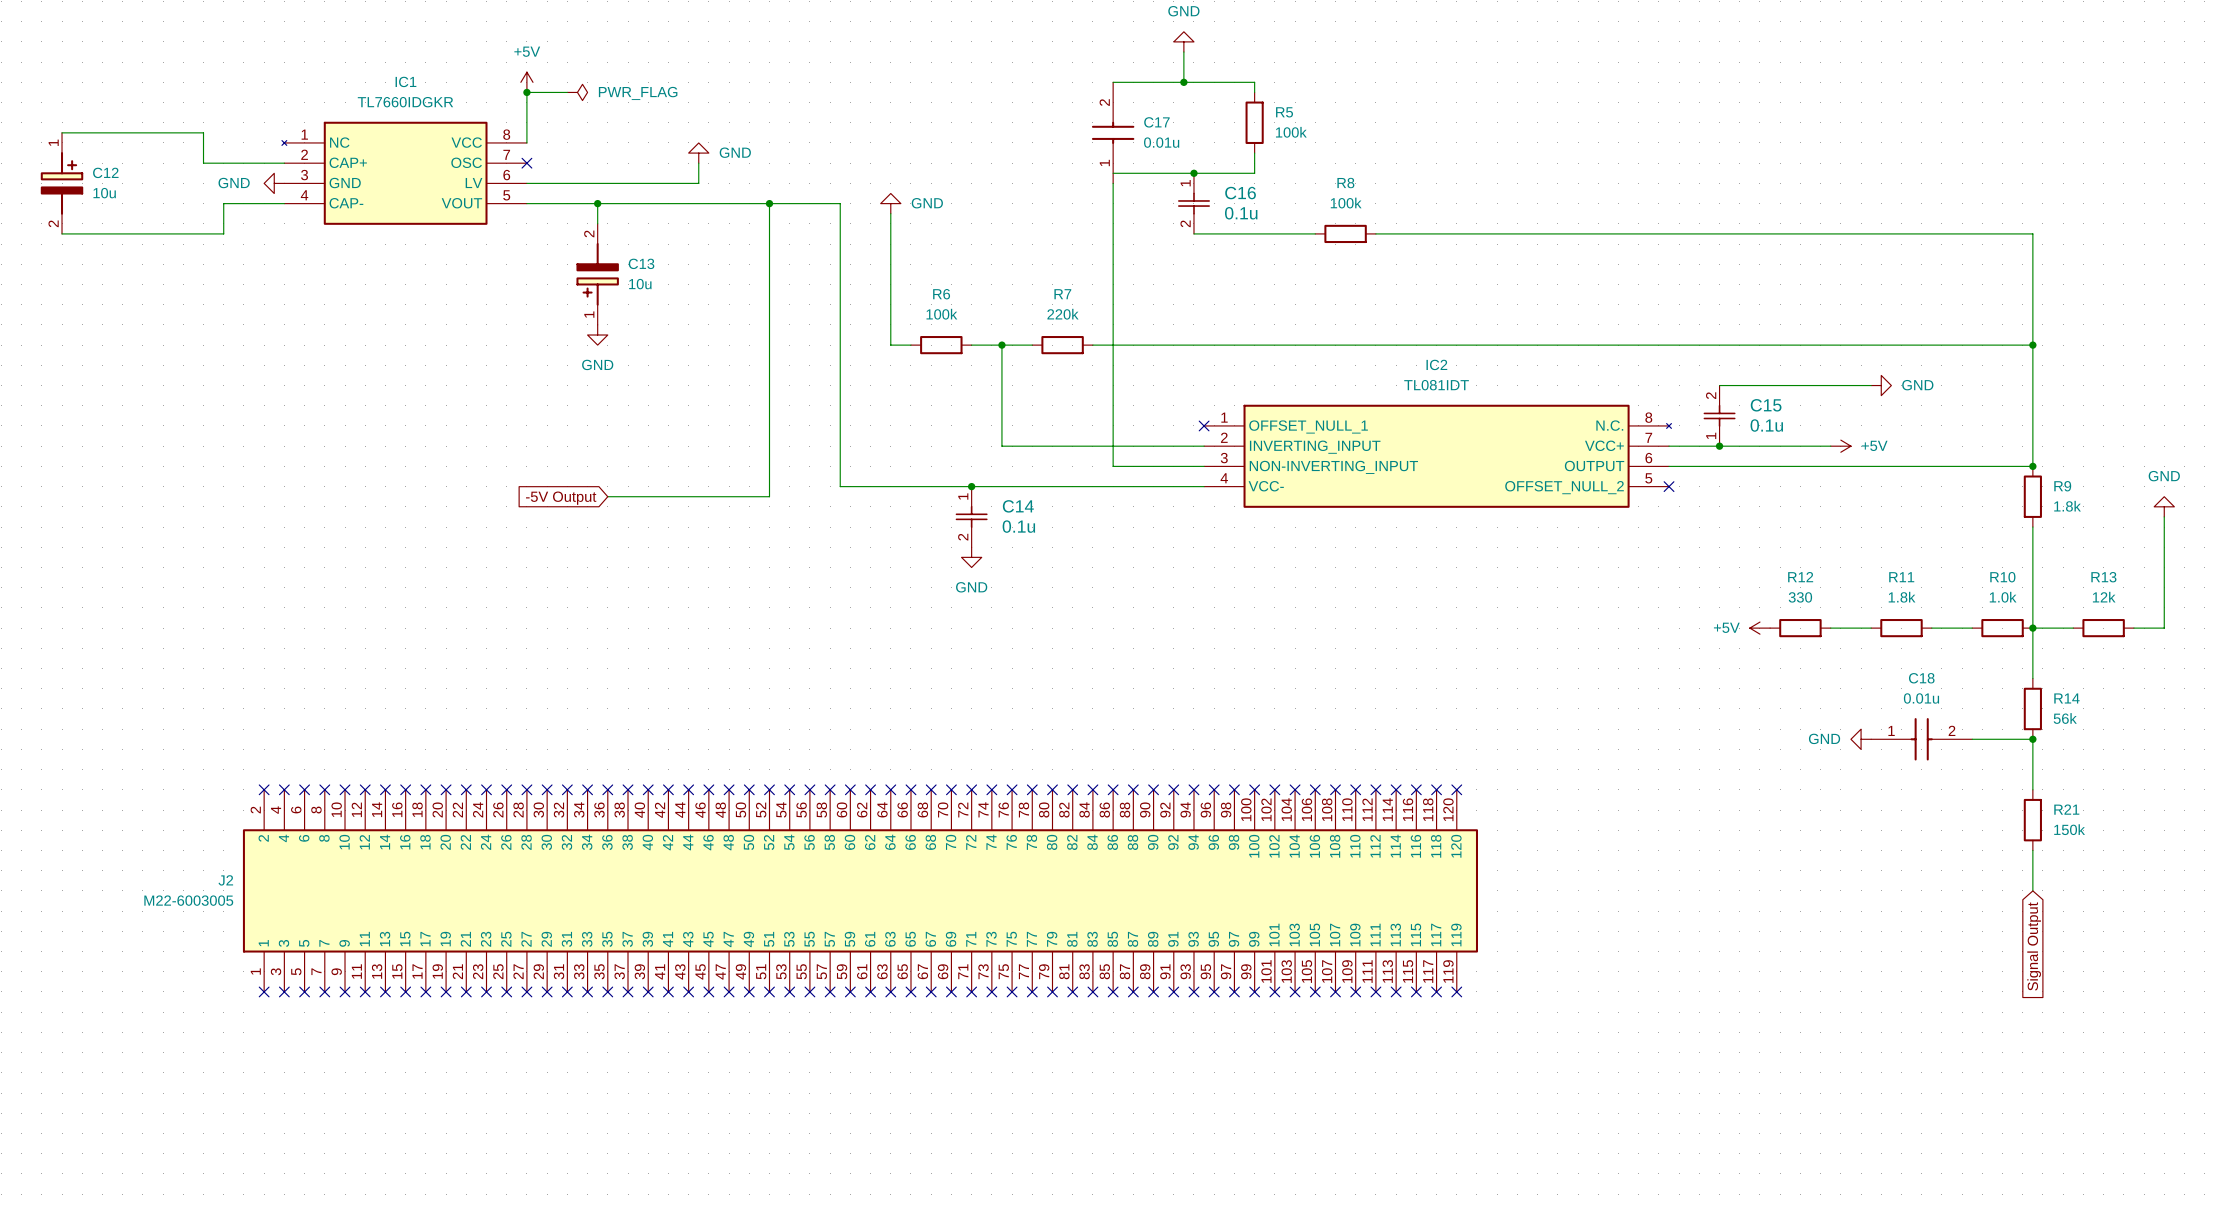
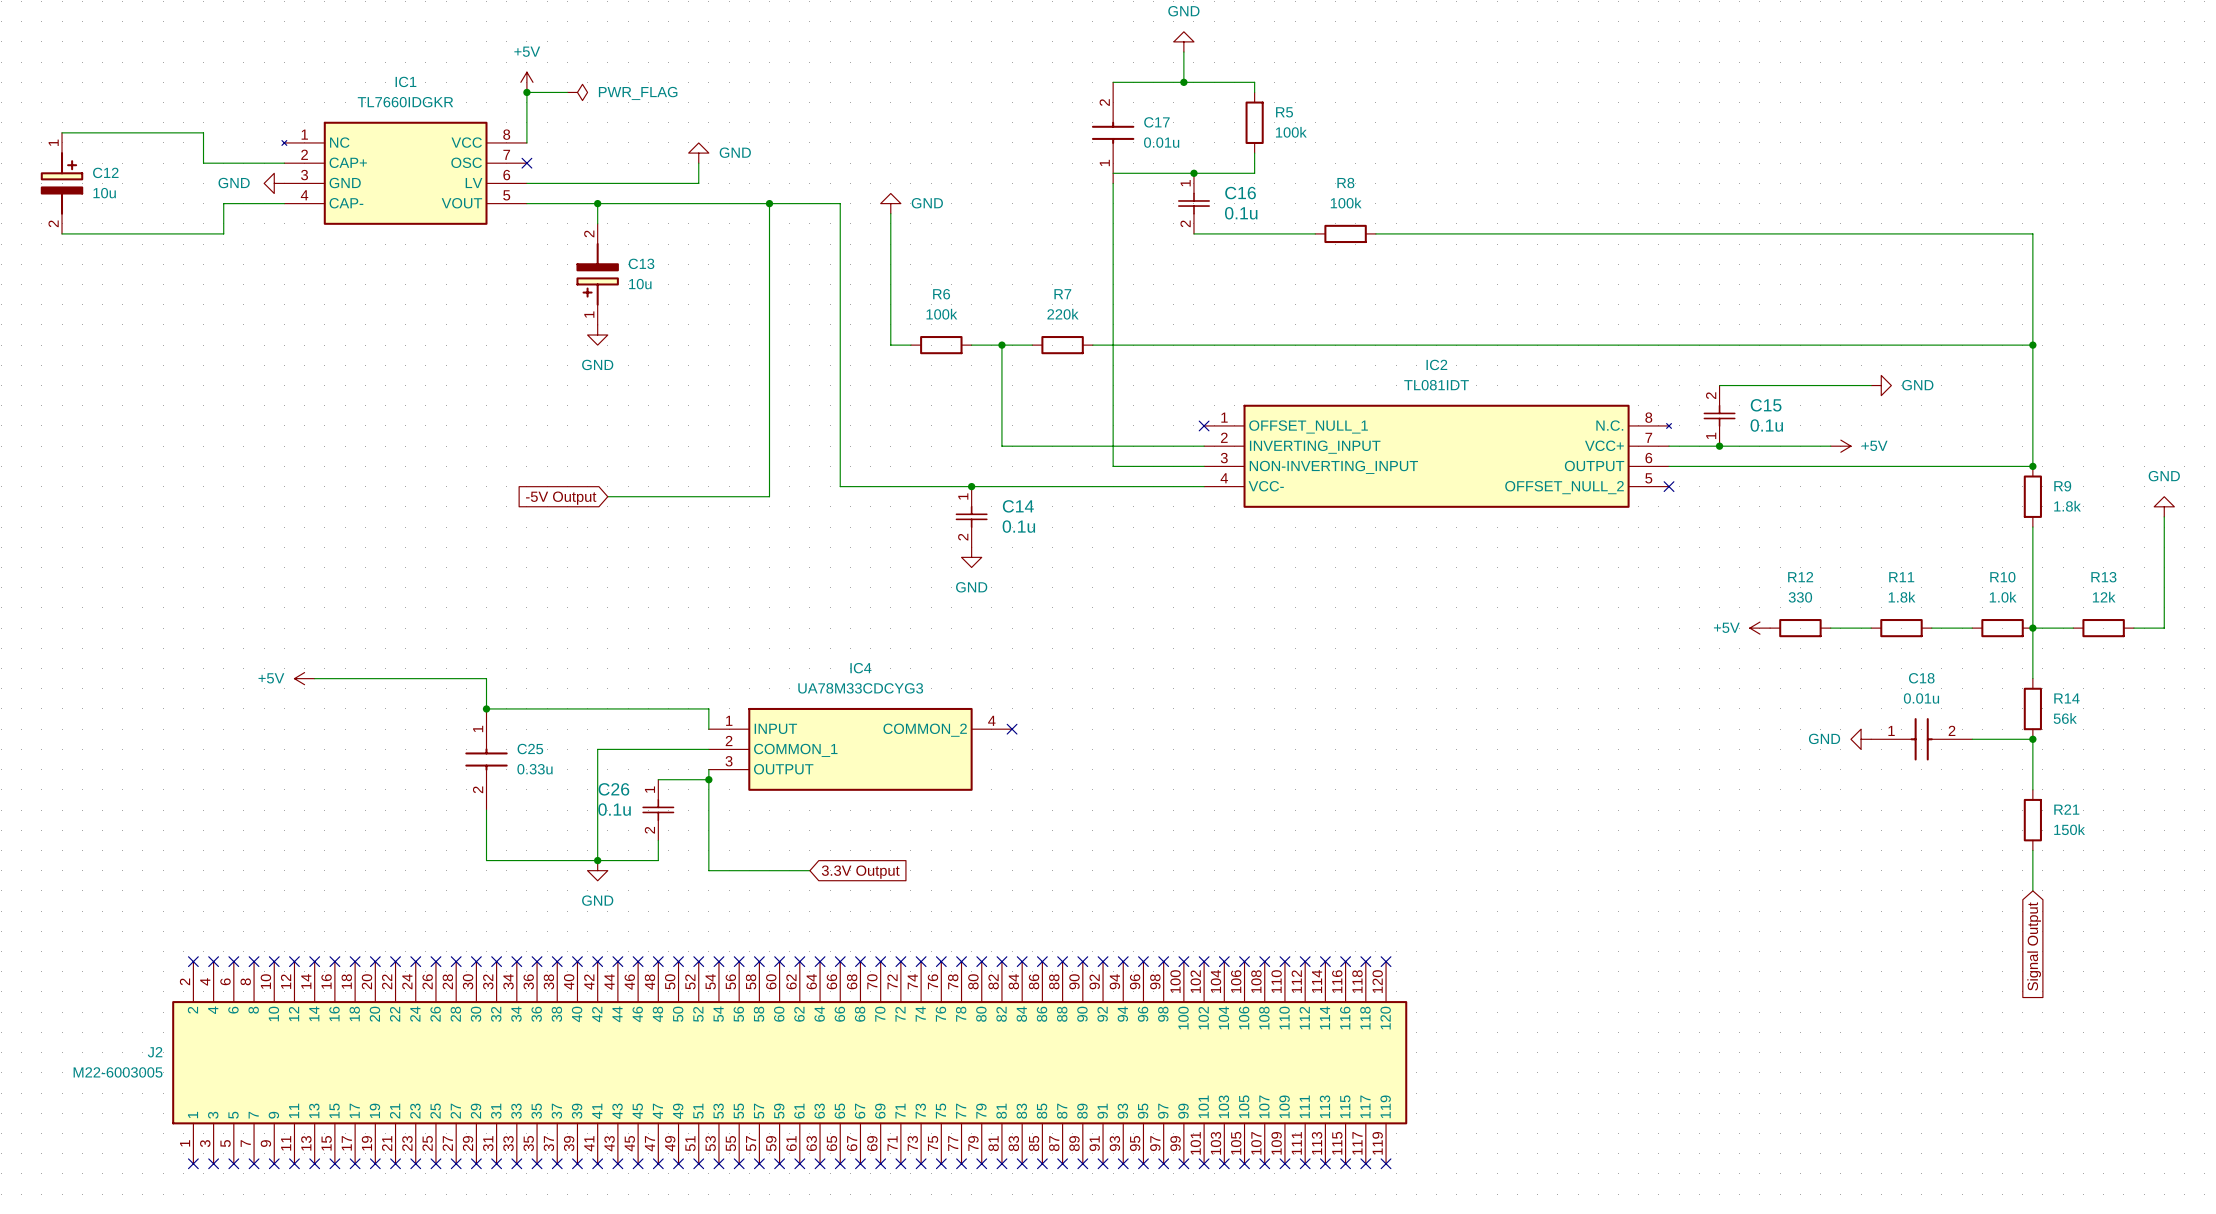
power symbol: none -> +5V (304, 678)
wire: none -> (314, 678) (486, 678) (486, 708) (708, 708) (708, 729)
junction: none -> (486, 708)
no-connect mark: none -> (1012, 729)
wire: none -> (708, 749) (597, 749) (597, 860)
IC4: none -> UA78M33CDCYG3 (860, 749)
C25: none -> 0.33u (486, 759)
wire: none -> (658, 779) (708, 779)
junction: none -> (708, 779)
no-connect mark: (264, 789) -> none
no-connect mark: (284, 789) -> none
no-connect mark: (304, 789) -> none
no-connect mark: (324, 789) -> none
no-connect mark: (345, 789) -> none
no-connect mark: (365, 789) -> none
no-connect mark: (385, 789) -> none
no-connect mark: (405, 789) -> none
no-connect mark: (425, 789) -> none
no-connect mark: (446, 789) -> none
no-connect mark: (466, 789) -> none
no-connect mark: (486, 789) -> none
no-connect mark: (506, 789) -> none
no-connect mark: (526, 789) -> none
no-connect mark: (547, 789) -> none
no-connect mark: (567, 789) -> none
no-connect mark: (587, 789) -> none
no-connect mark: (607, 789) -> none
no-connect mark: (628, 789) -> none
no-connect mark: (648, 789) -> none
no-connect mark: (668, 789) -> none
no-connect mark: (688, 789) -> none
no-connect mark: (708, 789) -> none
no-connect mark: (729, 789) -> none
no-connect mark: (749, 789) -> none
no-connect mark: (769, 789) -> none
no-connect mark: (789, 789) -> none
no-connect mark: (809, 789) -> none
no-connect mark: (830, 789) -> none
no-connect mark: (850, 789) -> none
no-connect mark: (870, 789) -> none
no-connect mark: (890, 789) -> none
no-connect mark: (910, 789) -> none
no-connect mark: (931, 789) -> none
no-connect mark: (951, 789) -> none
no-connect mark: (971, 789) -> none
no-connect mark: (991, 789) -> none
no-connect mark: (1012, 789) -> none
no-connect mark: (1032, 789) -> none
no-connect mark: (1052, 789) -> none
no-connect mark: (1072, 789) -> none
no-connect mark: (1092, 789) -> none
no-connect mark: (1113, 789) -> none
no-connect mark: (1133, 789) -> none
no-connect mark: (1153, 789) -> none
no-connect mark: (1173, 789) -> none
no-connect mark: (1193, 789) -> none
no-connect mark: (1214, 789) -> none
no-connect mark: (1234, 789) -> none
no-connect mark: (1254, 789) -> none
no-connect mark: (1274, 789) -> none
no-connect mark: (1295, 789) -> none
no-connect mark: (1315, 789) -> none
no-connect mark: (1335, 789) -> none
no-connect mark: (1355, 789) -> none
no-connect mark: (1375, 789) -> none
no-connect mark: (1396, 789) -> none
no-connect mark: (1416, 789) -> none
no-connect mark: (1436, 789) -> none
no-connect mark: (1456, 789) -> none
C26: none -> 0.1u (658, 810)
junction: none -> (597, 860)
power symbol: none -> GND (597, 870)
global label: none -> 3.3V Output (860, 872)
J2 position: (860, 890) -> (789, 1062)
no-connect mark: none -> (193, 961)
no-connect mark: none -> (213, 961)
no-connect mark: none -> (233, 961)
no-connect mark: none -> (254, 961)
no-connect mark: none -> (274, 961)
no-connect mark: none -> (294, 961)
no-connect mark: none -> (314, 961)
no-connect mark: none -> (334, 961)
no-connect mark: none -> (355, 961)
no-connect mark: none -> (375, 961)
no-connect mark: none -> (395, 961)
no-connect mark: none -> (415, 961)
no-connect mark: none -> (435, 961)
no-connect mark: none -> (456, 961)
no-connect mark: none -> (476, 961)
no-connect mark: none -> (496, 961)
no-connect mark: none -> (516, 961)
no-connect mark: none -> (537, 961)
no-connect mark: none -> (557, 961)
no-connect mark: none -> (577, 961)
no-connect mark: none -> (597, 961)
no-connect mark: none -> (617, 961)
no-connect mark: none -> (638, 961)
no-connect mark: none -> (658, 961)
no-connect mark: none -> (678, 961)
no-connect mark: none -> (698, 961)
no-connect mark: none -> (718, 961)
no-connect mark: none -> (739, 961)
no-connect mark: none -> (759, 961)
no-connect mark: none -> (779, 961)
no-connect mark: none -> (799, 961)
no-connect mark: none -> (820, 961)
no-connect mark: none -> (840, 961)
no-connect mark: none -> (860, 961)
no-connect mark: none -> (880, 961)
no-connect mark: none -> (900, 961)
no-connect mark: none -> (921, 961)
no-connect mark: none -> (941, 961)
no-connect mark: none -> (961, 961)
no-connect mark: none -> (981, 961)
no-connect mark: none -> (1001, 961)
no-connect mark: none -> (1022, 961)
no-connect mark: none -> (1042, 961)
no-connect mark: none -> (1062, 961)
no-connect mark: none -> (1082, 961)
no-connect mark: none -> (1103, 961)
no-connect mark: none -> (1123, 961)
no-connect mark: none -> (1143, 961)
no-connect mark: none -> (1163, 961)
no-connect mark: none -> (1183, 961)
no-connect mark: none -> (1204, 961)
no-connect mark: none -> (1224, 961)
no-connect mark: none -> (1244, 961)
no-connect mark: none -> (1264, 961)
no-connect mark: none -> (1284, 961)
no-connect mark: none -> (1305, 961)
no-connect mark: none -> (1325, 961)
no-connect mark: none -> (1345, 961)
no-connect mark: none -> (1365, 961)
no-connect mark: none -> (1386, 961)
no-connect mark: (264, 991) -> none
no-connect mark: (284, 991) -> none
no-connect mark: (304, 991) -> none
no-connect mark: (324, 991) -> none
no-connect mark: (345, 991) -> none
no-connect mark: (365, 991) -> none
no-connect mark: (385, 991) -> none
no-connect mark: (405, 991) -> none
no-connect mark: (425, 991) -> none
no-connect mark: (446, 991) -> none
no-connect mark: (466, 991) -> none
no-connect mark: (486, 991) -> none
no-connect mark: (506, 991) -> none
no-connect mark: (526, 991) -> none
no-connect mark: (547, 991) -> none
no-connect mark: (567, 991) -> none
no-connect mark: (587, 991) -> none
no-connect mark: (607, 991) -> none
no-connect mark: (628, 991) -> none
no-connect mark: (648, 991) -> none
no-connect mark: (668, 991) -> none
no-connect mark: (688, 991) -> none
no-connect mark: (708, 991) -> none
no-connect mark: (729, 991) -> none
no-connect mark: (749, 991) -> none
no-connect mark: (769, 991) -> none
no-connect mark: (789, 991) -> none
no-connect mark: (809, 991) -> none
no-connect mark: (830, 991) -> none
no-connect mark: (850, 991) -> none
no-connect mark: (870, 991) -> none
no-connect mark: (890, 991) -> none
no-connect mark: (910, 991) -> none
no-connect mark: (931, 991) -> none
no-connect mark: (951, 991) -> none
no-connect mark: (971, 991) -> none
no-connect mark: (991, 991) -> none
no-connect mark: (1012, 991) -> none
no-connect mark: (1032, 991) -> none
no-connect mark: (1052, 991) -> none
no-connect mark: (1072, 991) -> none
no-connect mark: (1092, 991) -> none
no-connect mark: (1113, 991) -> none
no-connect mark: (1133, 991) -> none
no-connect mark: (1153, 991) -> none
no-connect mark: (1173, 991) -> none
no-connect mark: (1193, 991) -> none
no-connect mark: (1214, 991) -> none
no-connect mark: (1234, 991) -> none
no-connect mark: (1254, 991) -> none
no-connect mark: (1274, 991) -> none
no-connect mark: (1295, 991) -> none
no-connect mark: (1315, 991) -> none
no-connect mark: (1335, 991) -> none
no-connect mark: (1355, 991) -> none
no-connect mark: (1375, 991) -> none
no-connect mark: (1396, 991) -> none
no-connect mark: (1416, 991) -> none
no-connect mark: (1436, 991) -> none
no-connect mark: (1456, 991) -> none
no-connect mark: none -> (193, 1163)
no-connect mark: none -> (213, 1163)
no-connect mark: none -> (233, 1163)
no-connect mark: none -> (254, 1163)
no-connect mark: none -> (274, 1163)
no-connect mark: none -> (294, 1163)
no-connect mark: none -> (314, 1163)
no-connect mark: none -> (334, 1163)
no-connect mark: none -> (355, 1163)
no-connect mark: none -> (375, 1163)
no-connect mark: none -> (395, 1163)
no-connect mark: none -> (415, 1163)
no-connect mark: none -> (435, 1163)
no-connect mark: none -> (456, 1163)
no-connect mark: none -> (476, 1163)
no-connect mark: none -> (496, 1163)
no-connect mark: none -> (516, 1163)
no-connect mark: none -> (537, 1163)
no-connect mark: none -> (557, 1163)
no-connect mark: none -> (577, 1163)
no-connect mark: none -> (597, 1163)
no-connect mark: none -> (617, 1163)
no-connect mark: none -> (638, 1163)
no-connect mark: none -> (658, 1163)
no-connect mark: none -> (678, 1163)
no-connect mark: none -> (698, 1163)
no-connect mark: none -> (718, 1163)
no-connect mark: none -> (739, 1163)
no-connect mark: none -> (759, 1163)
no-connect mark: none -> (779, 1163)
no-connect mark: none -> (799, 1163)
no-connect mark: none -> (820, 1163)
no-connect mark: none -> (840, 1163)
no-connect mark: none -> (860, 1163)
no-connect mark: none -> (880, 1163)
no-connect mark: none -> (900, 1163)
no-connect mark: none -> (921, 1163)
no-connect mark: none -> (941, 1163)
no-connect mark: none -> (961, 1163)
no-connect mark: none -> (981, 1163)
no-connect mark: none -> (1001, 1163)
no-connect mark: none -> (1022, 1163)
no-connect mark: none -> (1042, 1163)
no-connect mark: none -> (1062, 1163)
no-connect mark: none -> (1082, 1163)
no-connect mark: none -> (1103, 1163)
no-connect mark: none -> (1123, 1163)
no-connect mark: none -> (1143, 1163)
no-connect mark: none -> (1163, 1163)
no-connect mark: none -> (1183, 1163)
no-connect mark: none -> (1204, 1163)
no-connect mark: none -> (1224, 1163)
no-connect mark: none -> (1244, 1163)
no-connect mark: none -> (1264, 1163)
no-connect mark: none -> (1284, 1163)
no-connect mark: none -> (1305, 1163)
no-connect mark: none -> (1325, 1163)
no-connect mark: none -> (1345, 1163)
no-connect mark: none -> (1365, 1163)
no-connect mark: none -> (1386, 1163)

